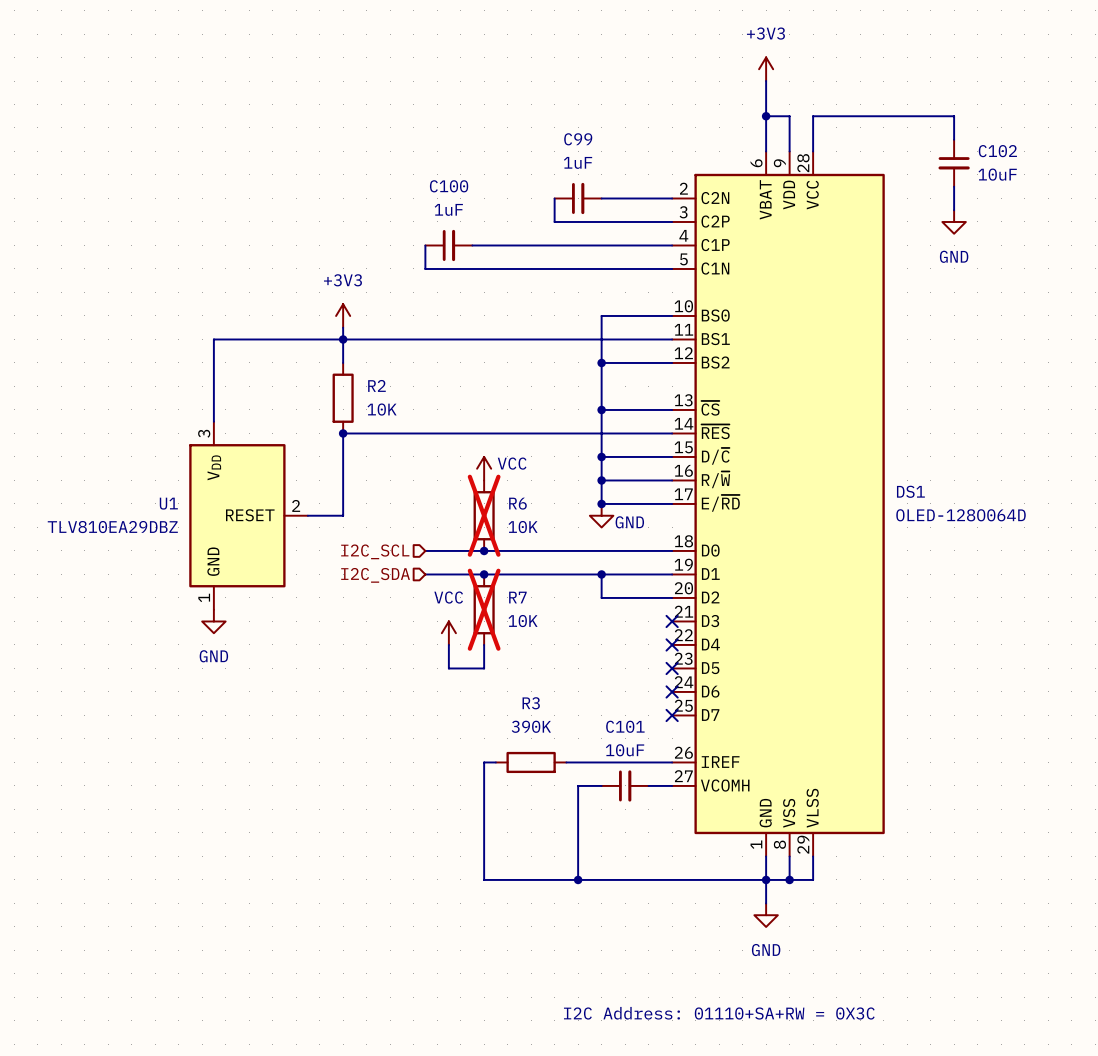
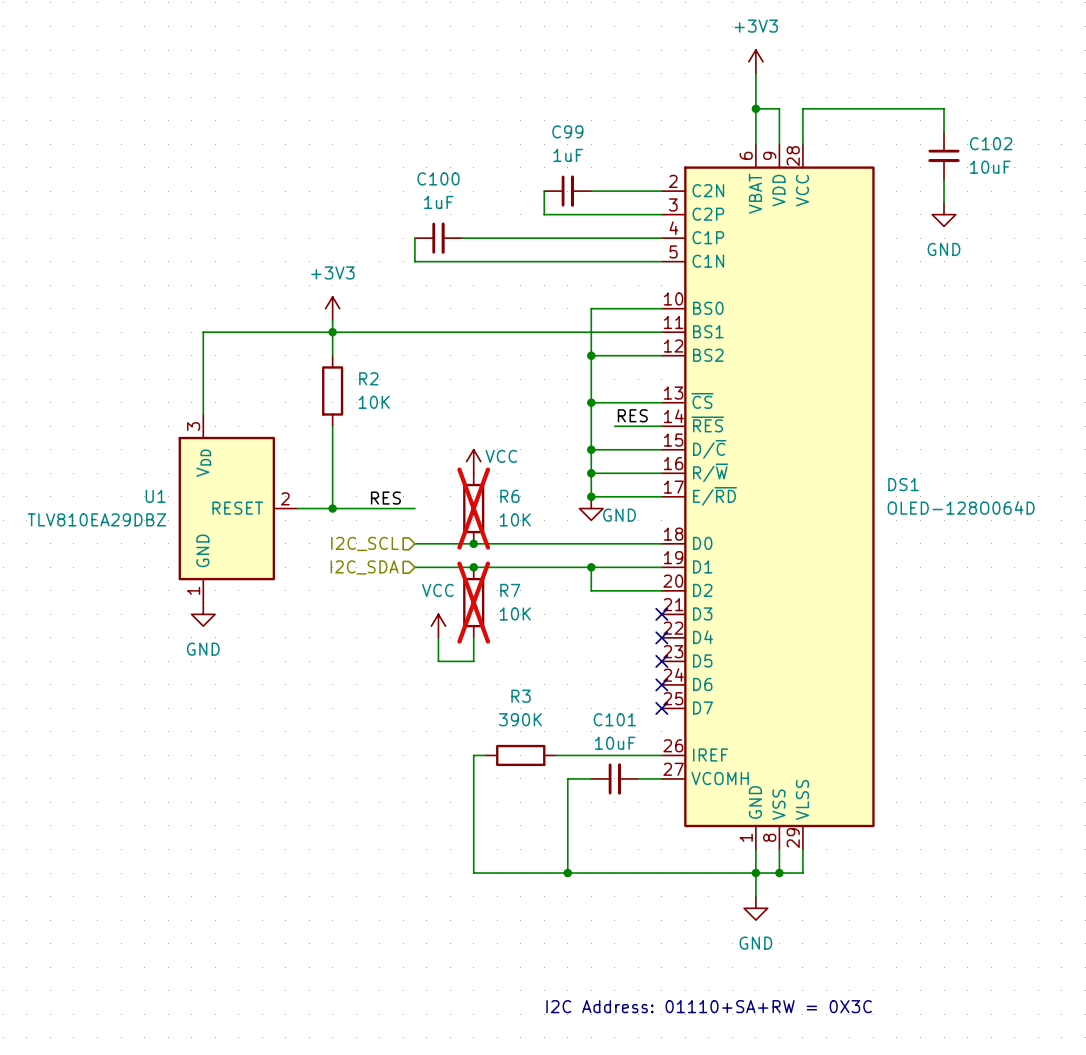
label: none -> RES (632, 415)
wire: (343, 433) (625, 433) -> none
junction: (343, 433) -> none
label: none -> RES (385, 498)
wire: none -> (332, 508) (414, 508)
junction: none -> (332, 508)

